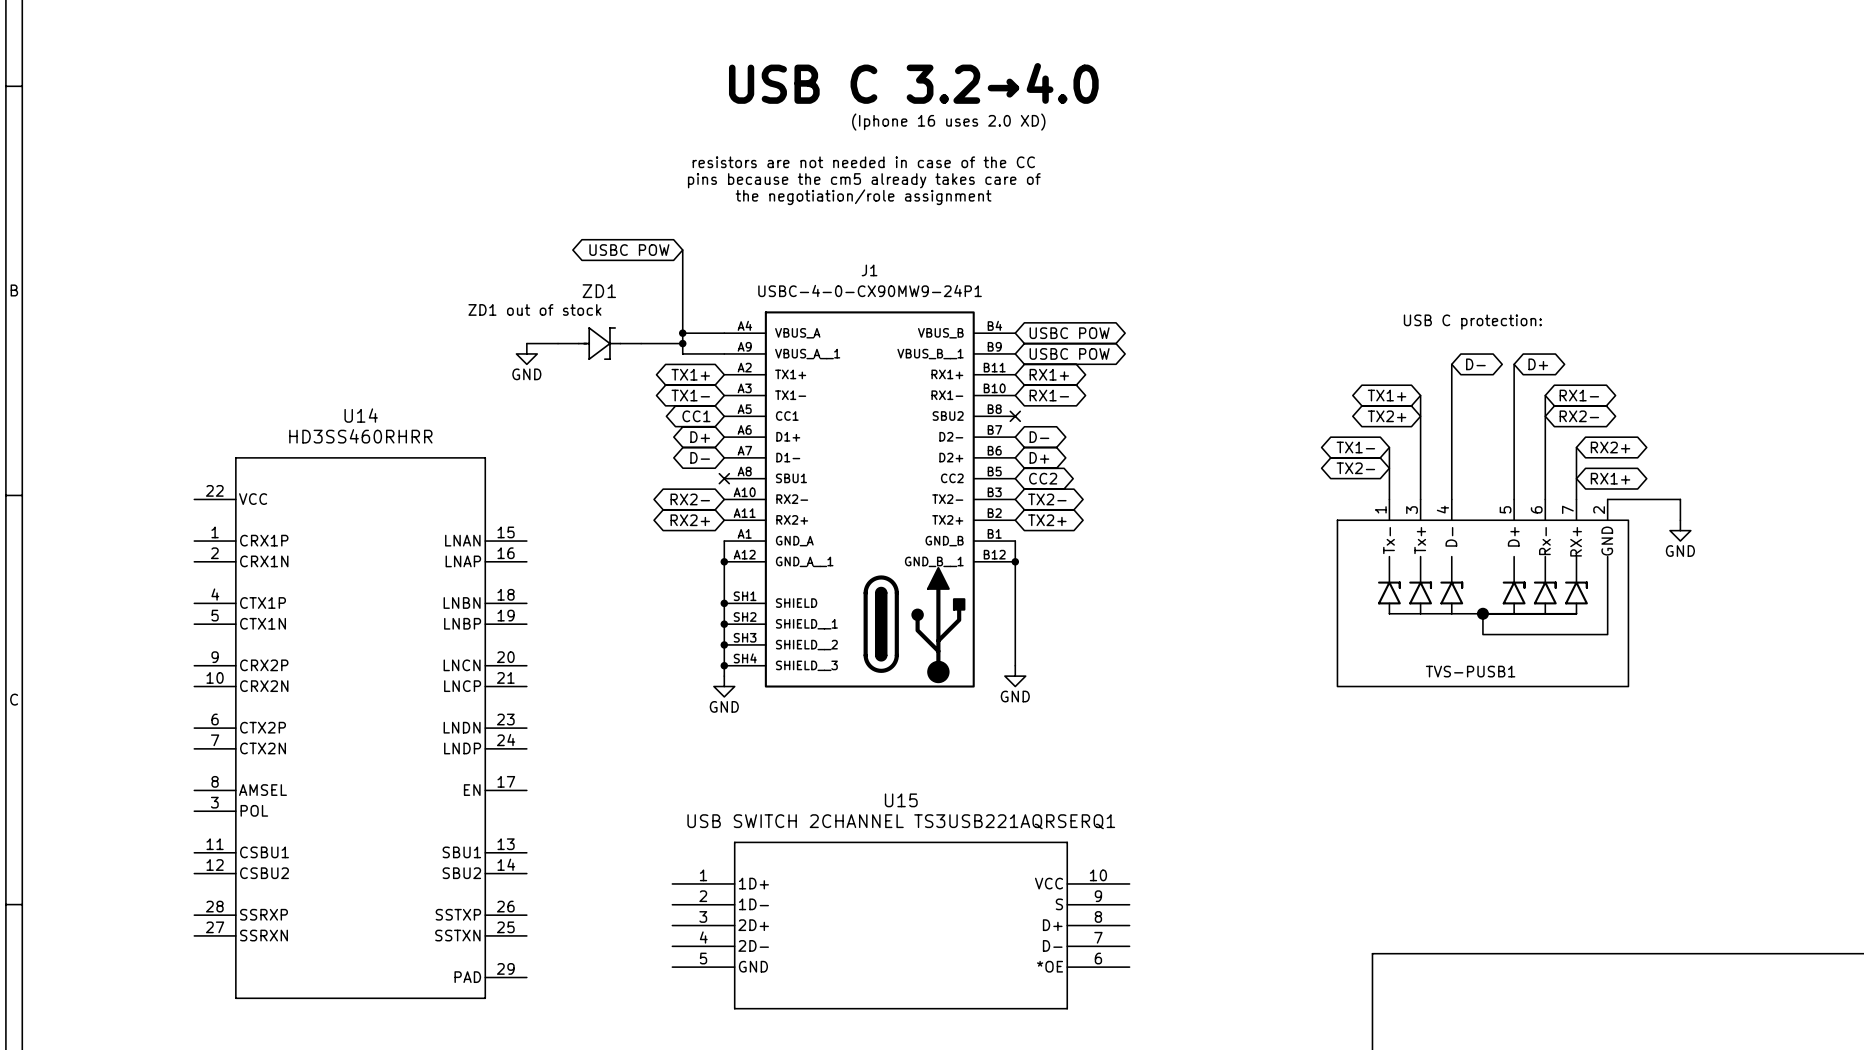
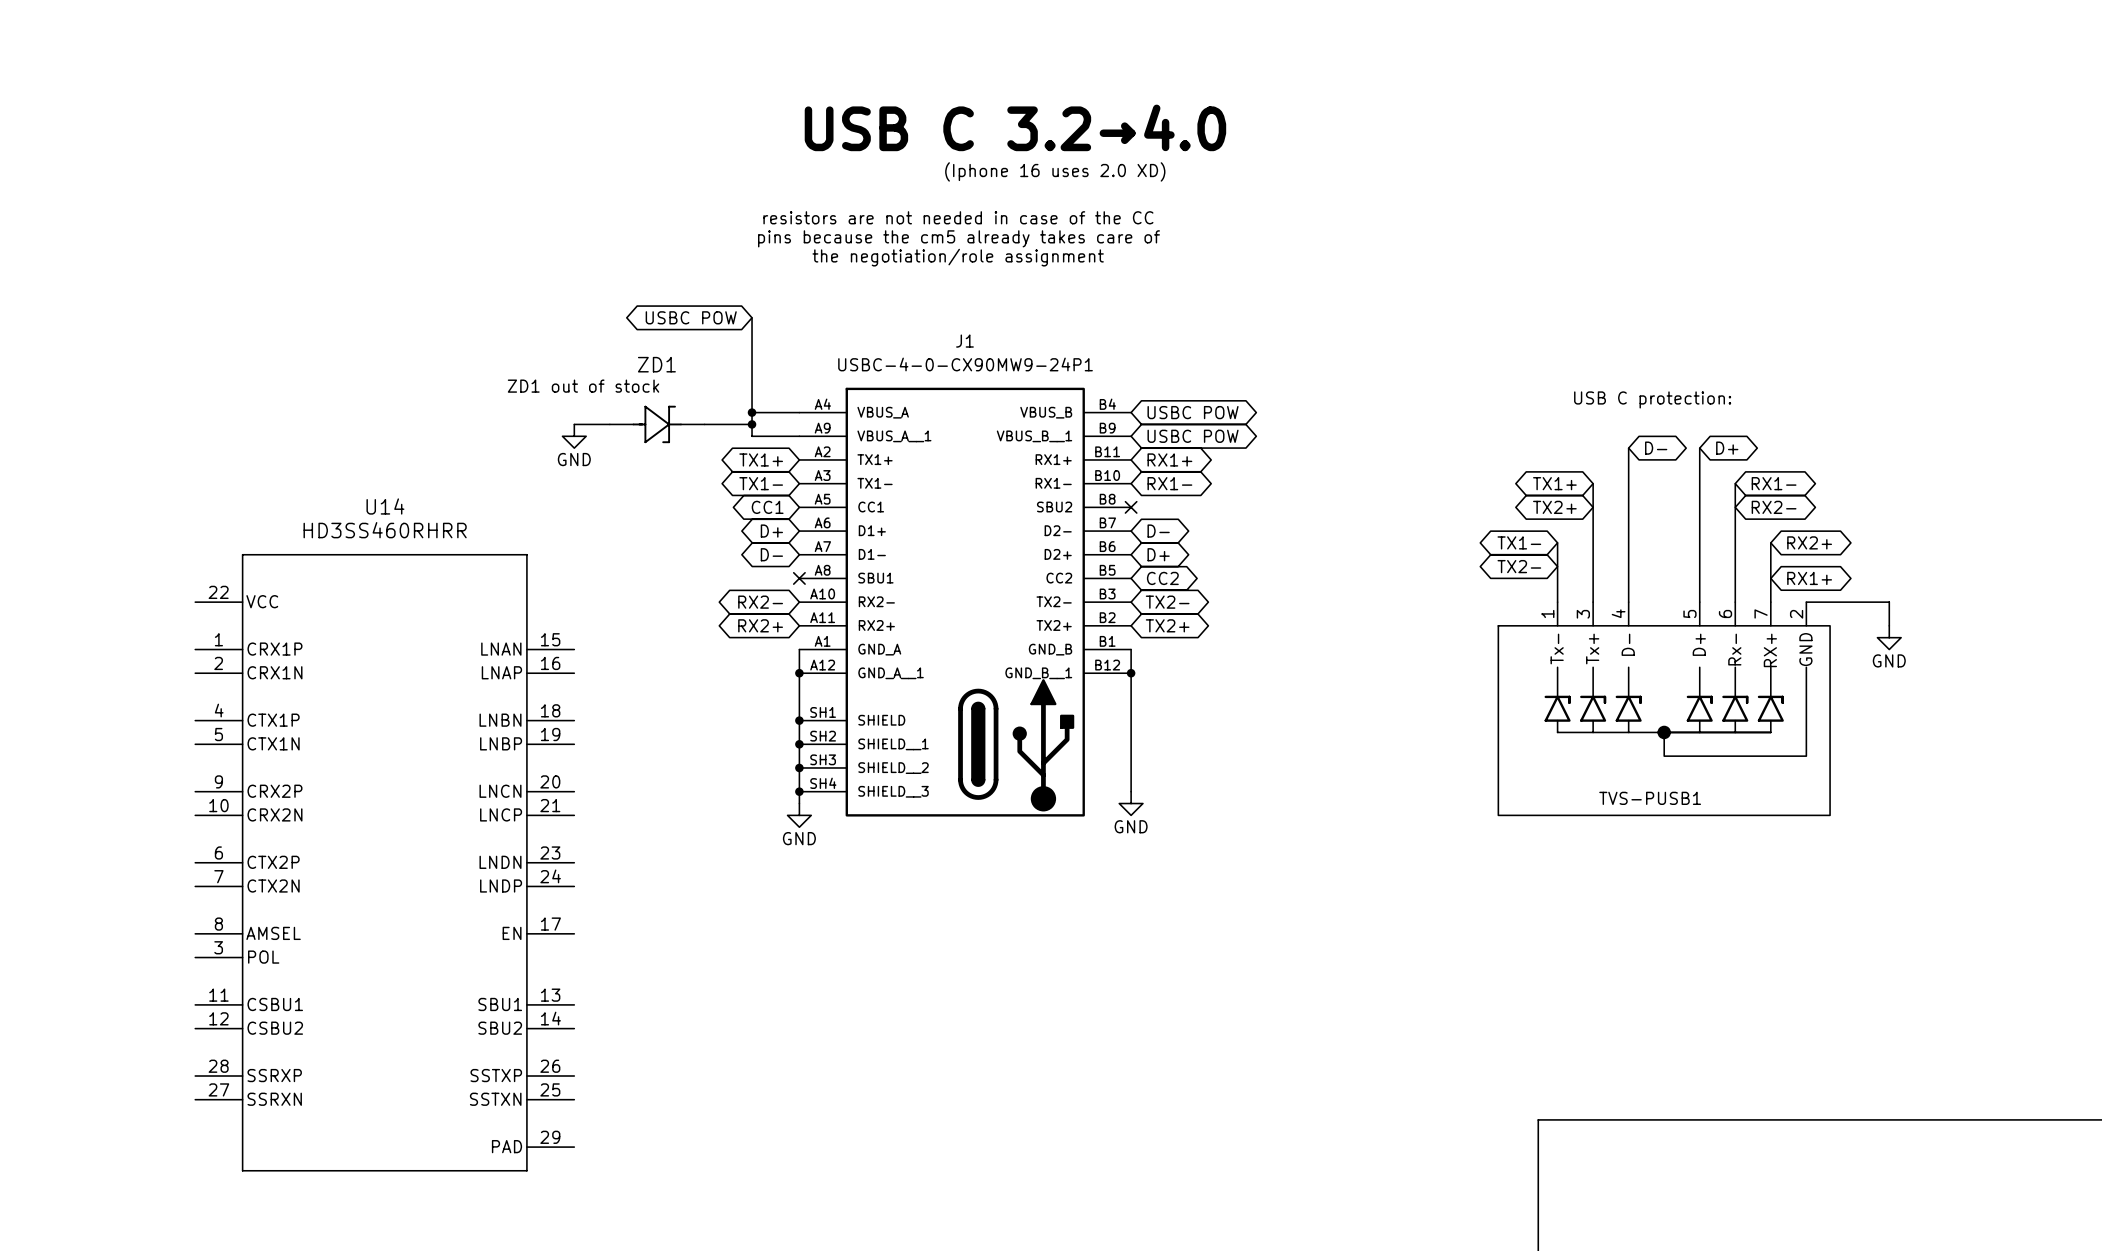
U15: USB SWITCH 2CHANNEL TS3USB221AQRSERQ1 (900, 925) -> none

